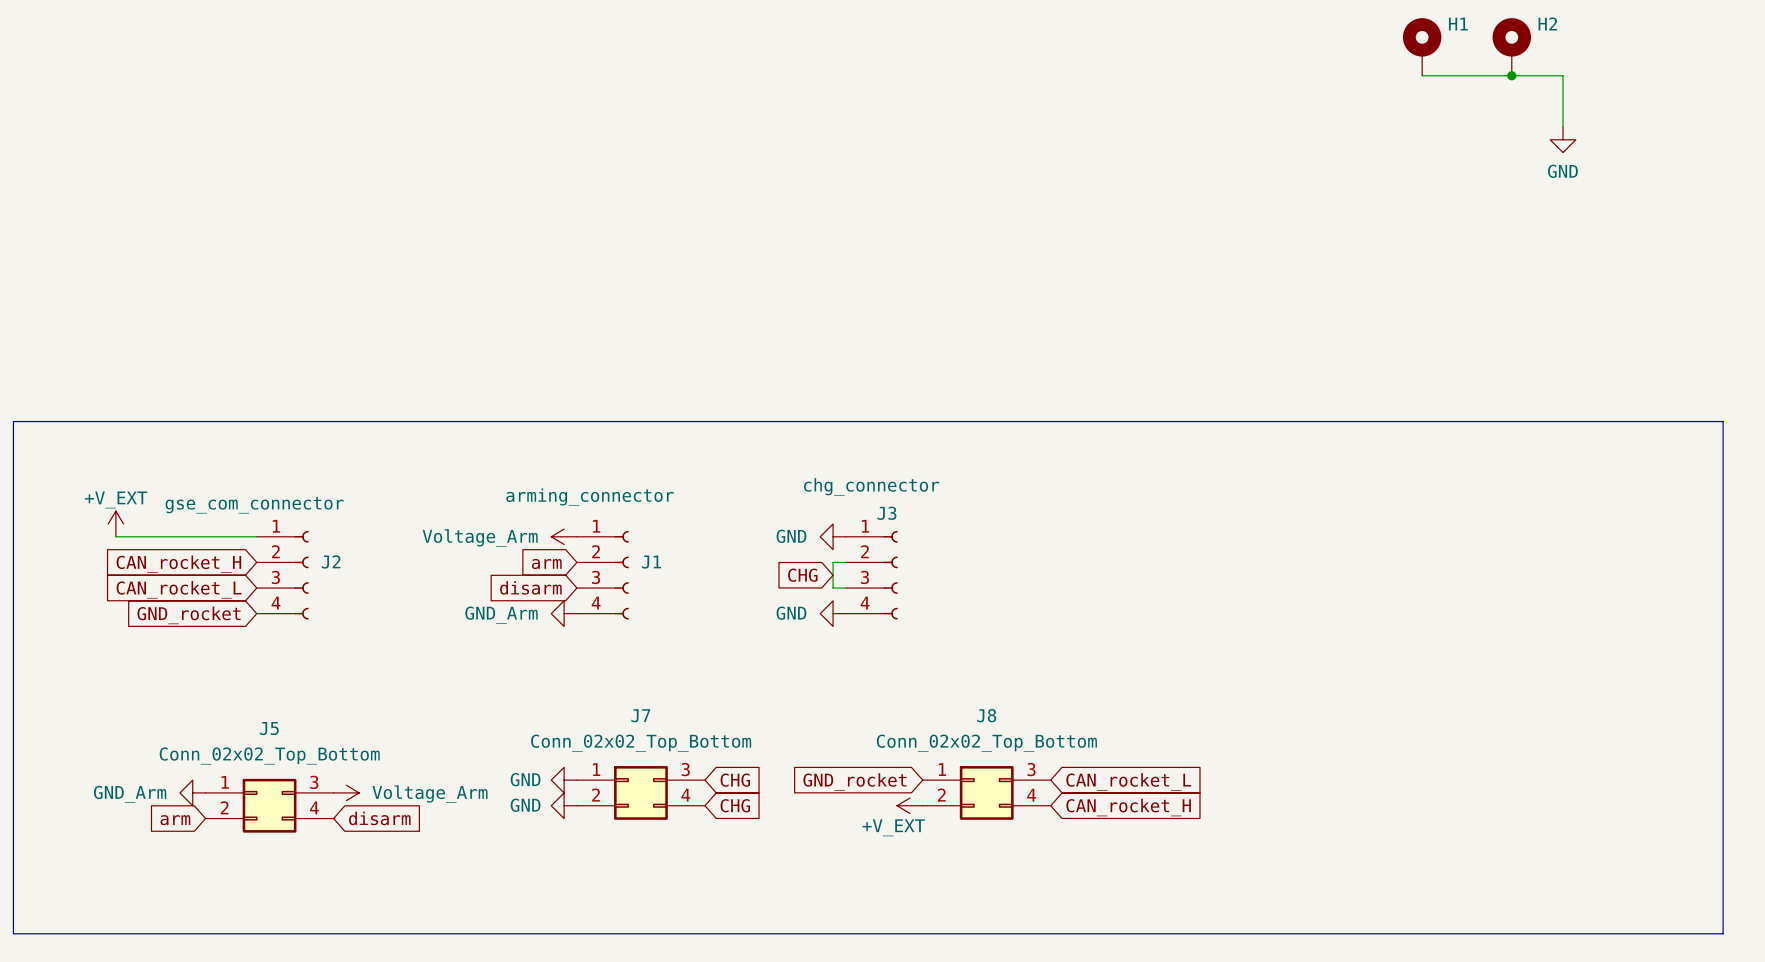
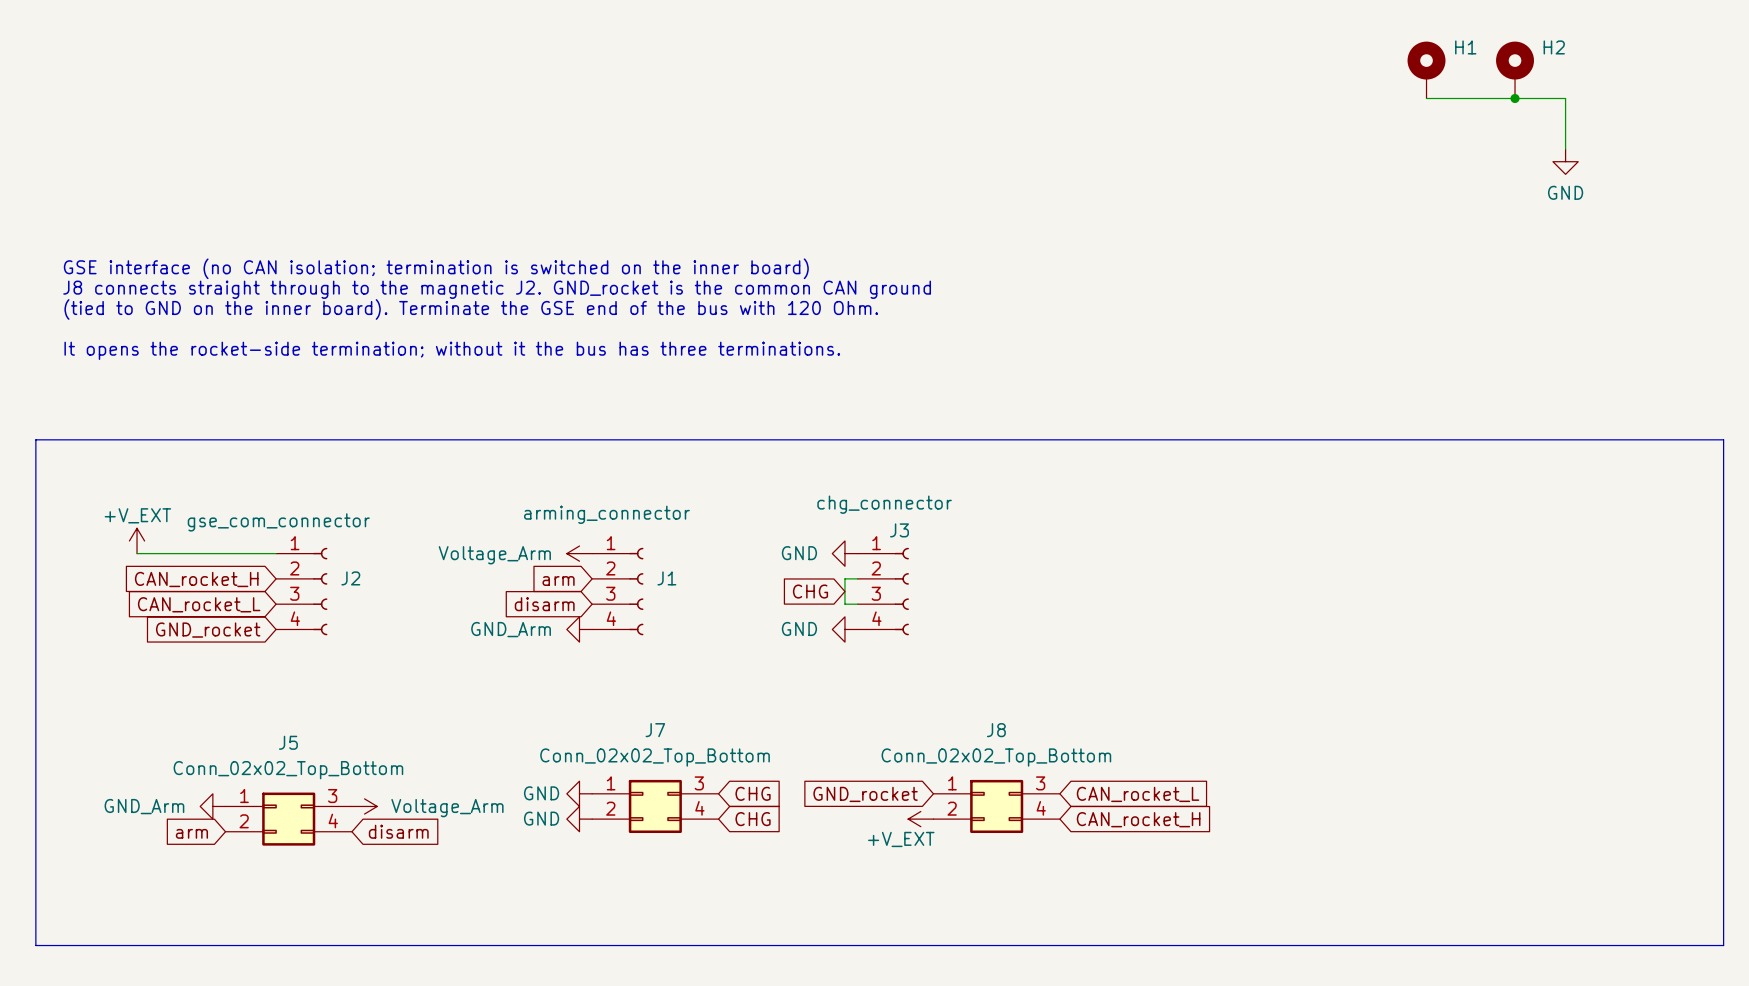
text: none -> GSE interface (no CAN isolation; termination is switched on the inner board) (436, 268)
text: none -> J8 connects straight through to the magnetic J2. GND_rocket is the common CAN ground (497, 289)
text: none -> (tied to GND on the inner board). Terminate the GSE end of the bus with 120 Ohm. (471, 309)
text: none -> It opens the rocket-side termination; without it the bus has three terminations. (452, 350)

